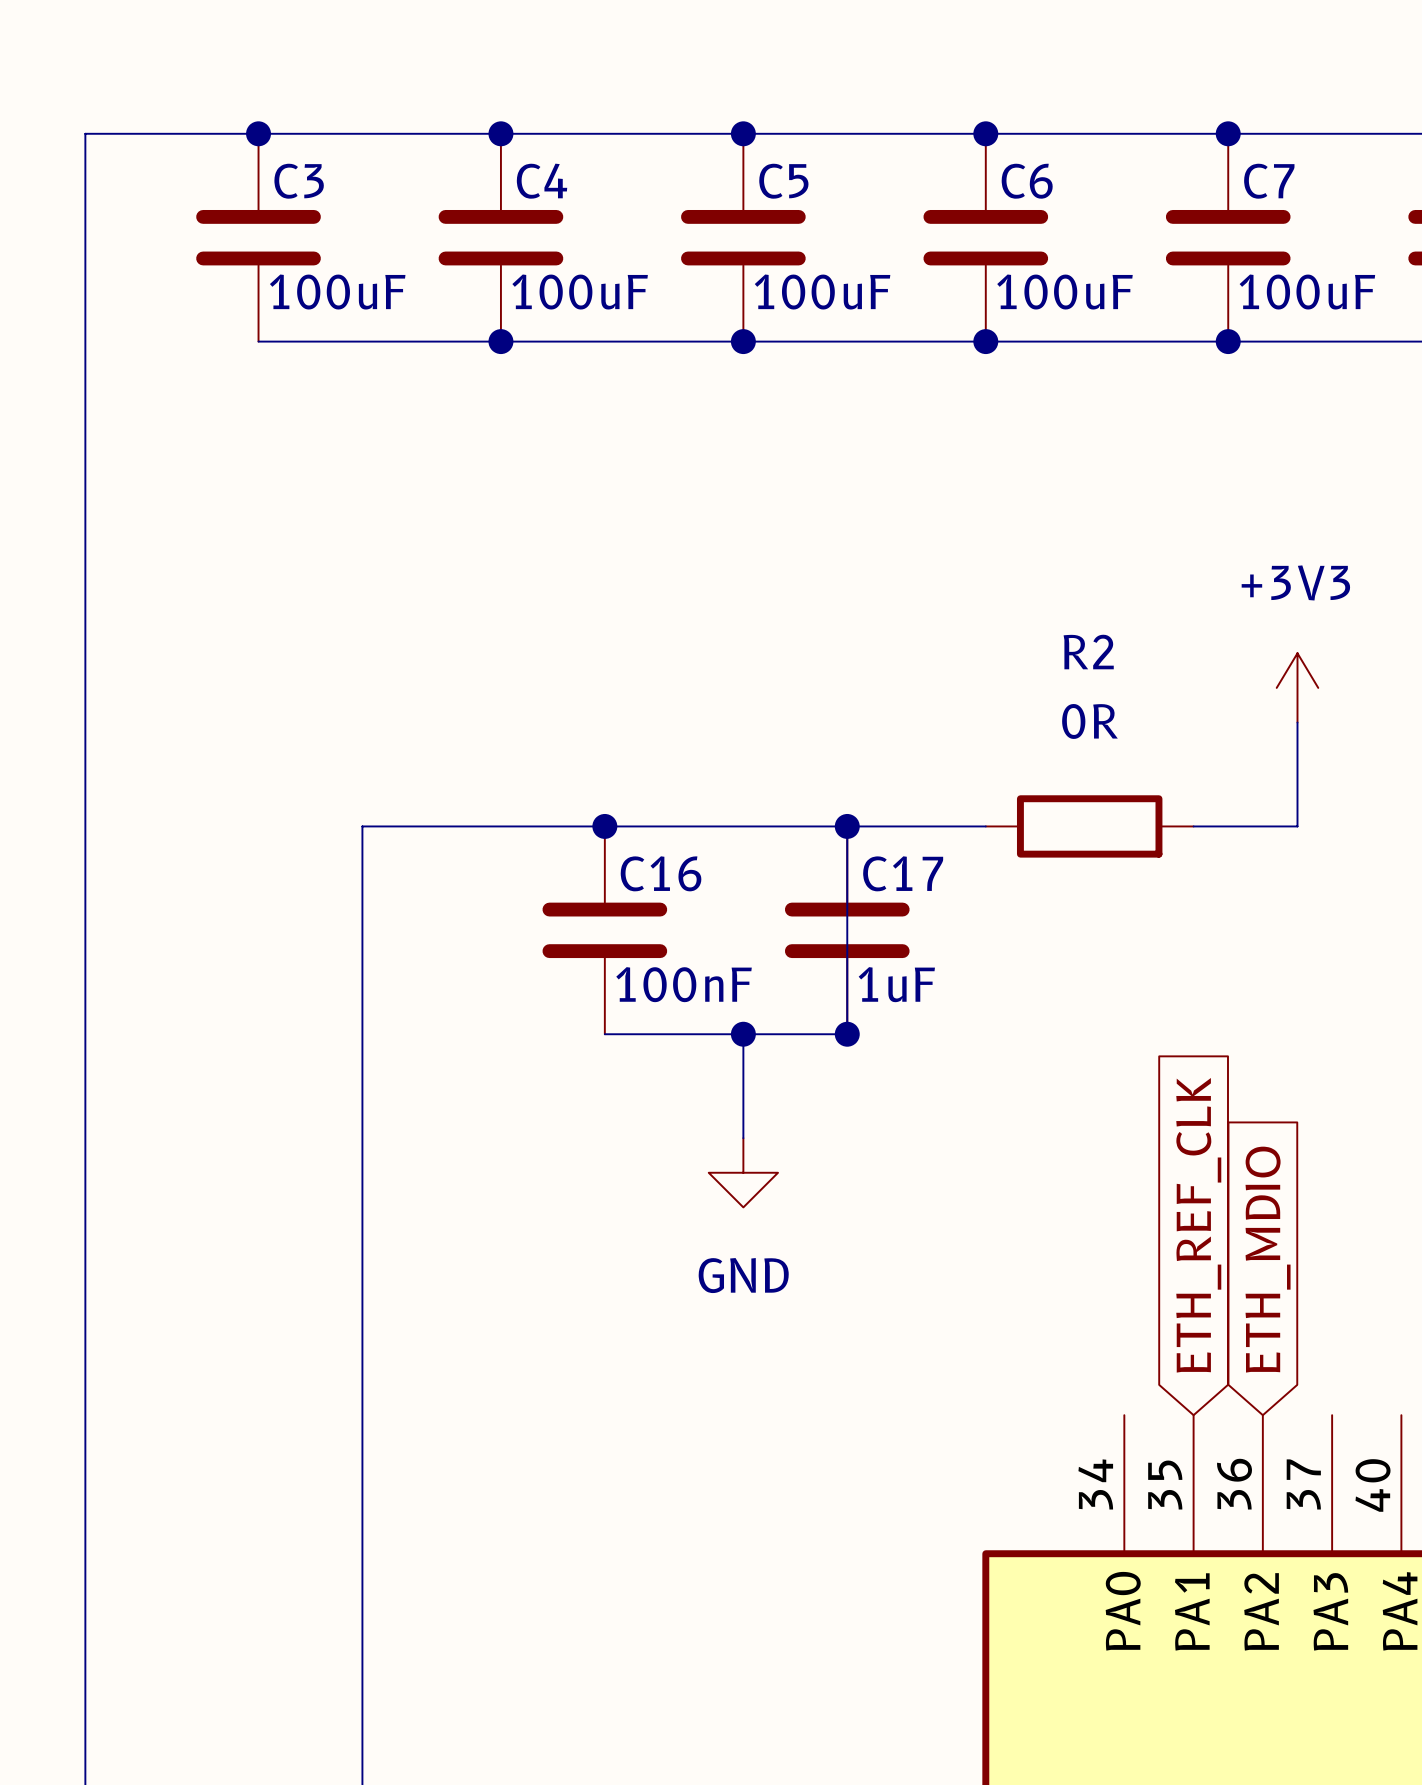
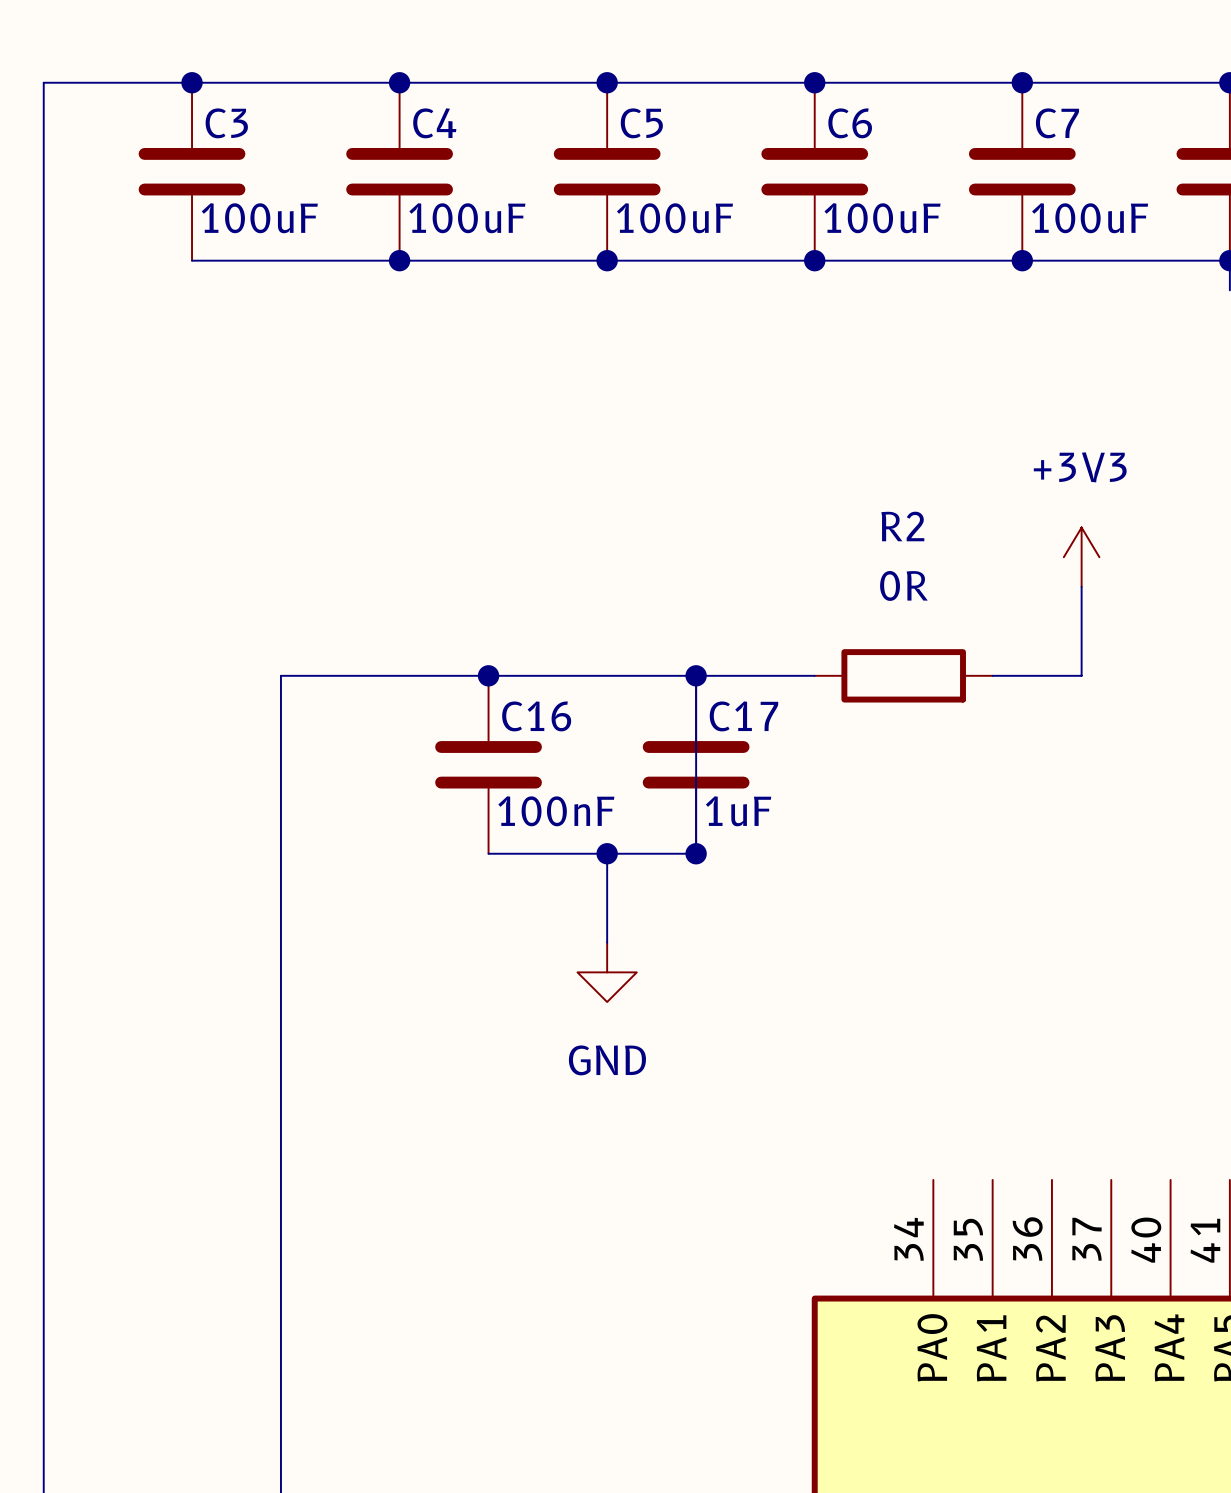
global label: ETH_REF_CLK (1198, 1225) -> none
global label: ETH_MDIO (1268, 1259) -> none

